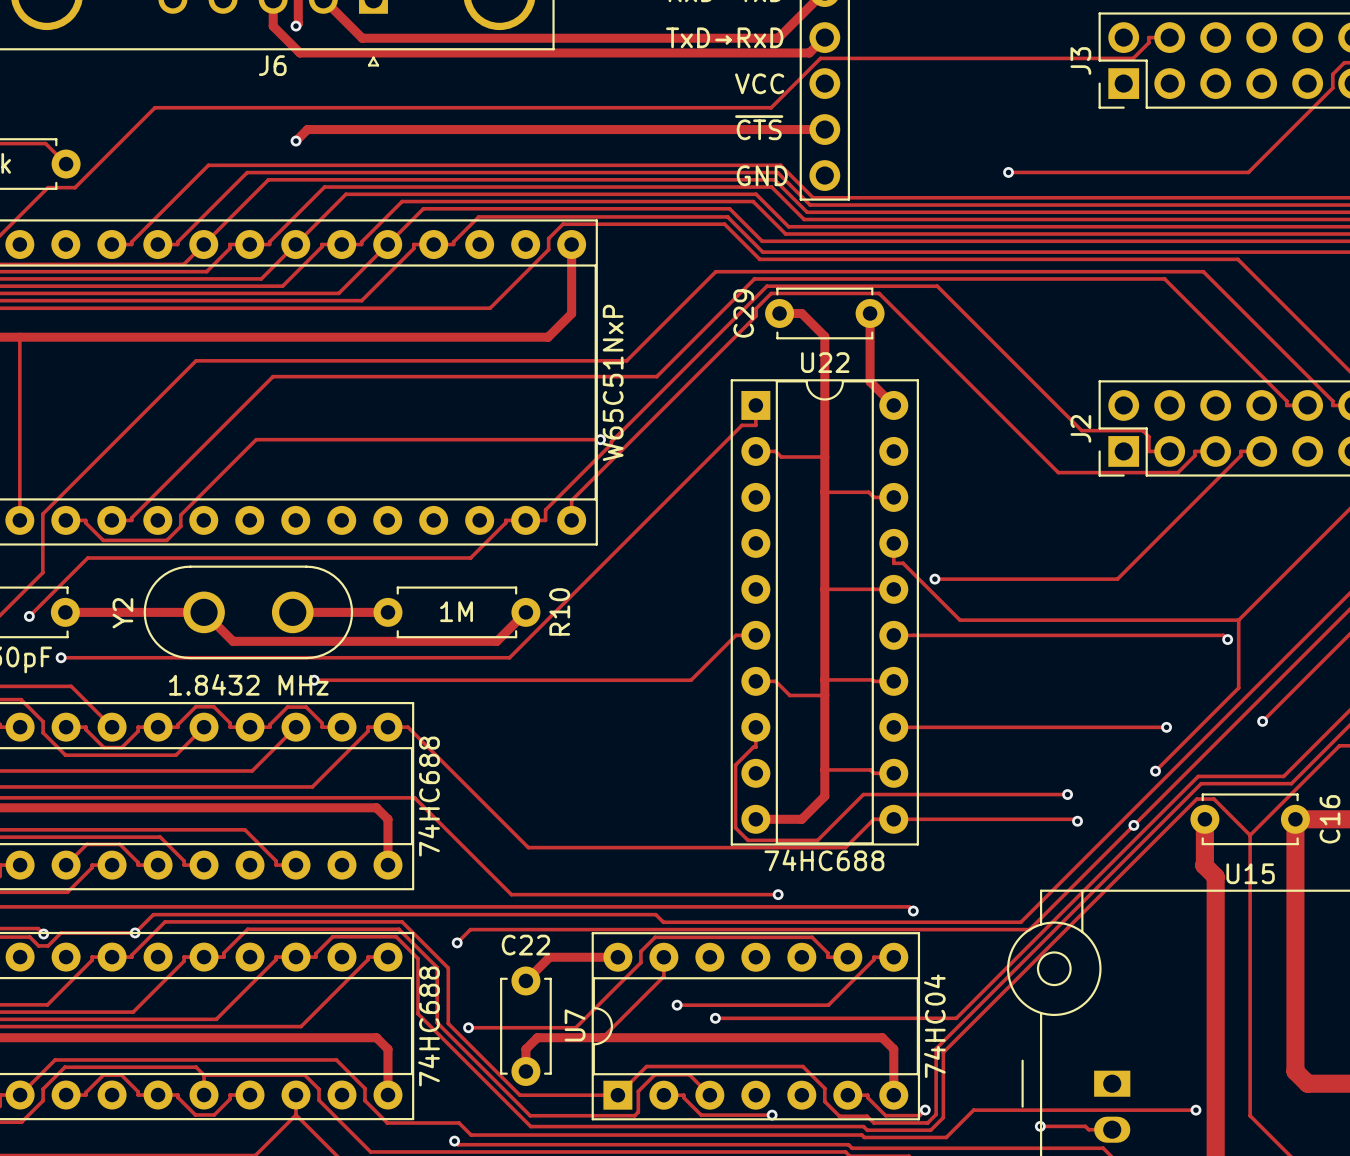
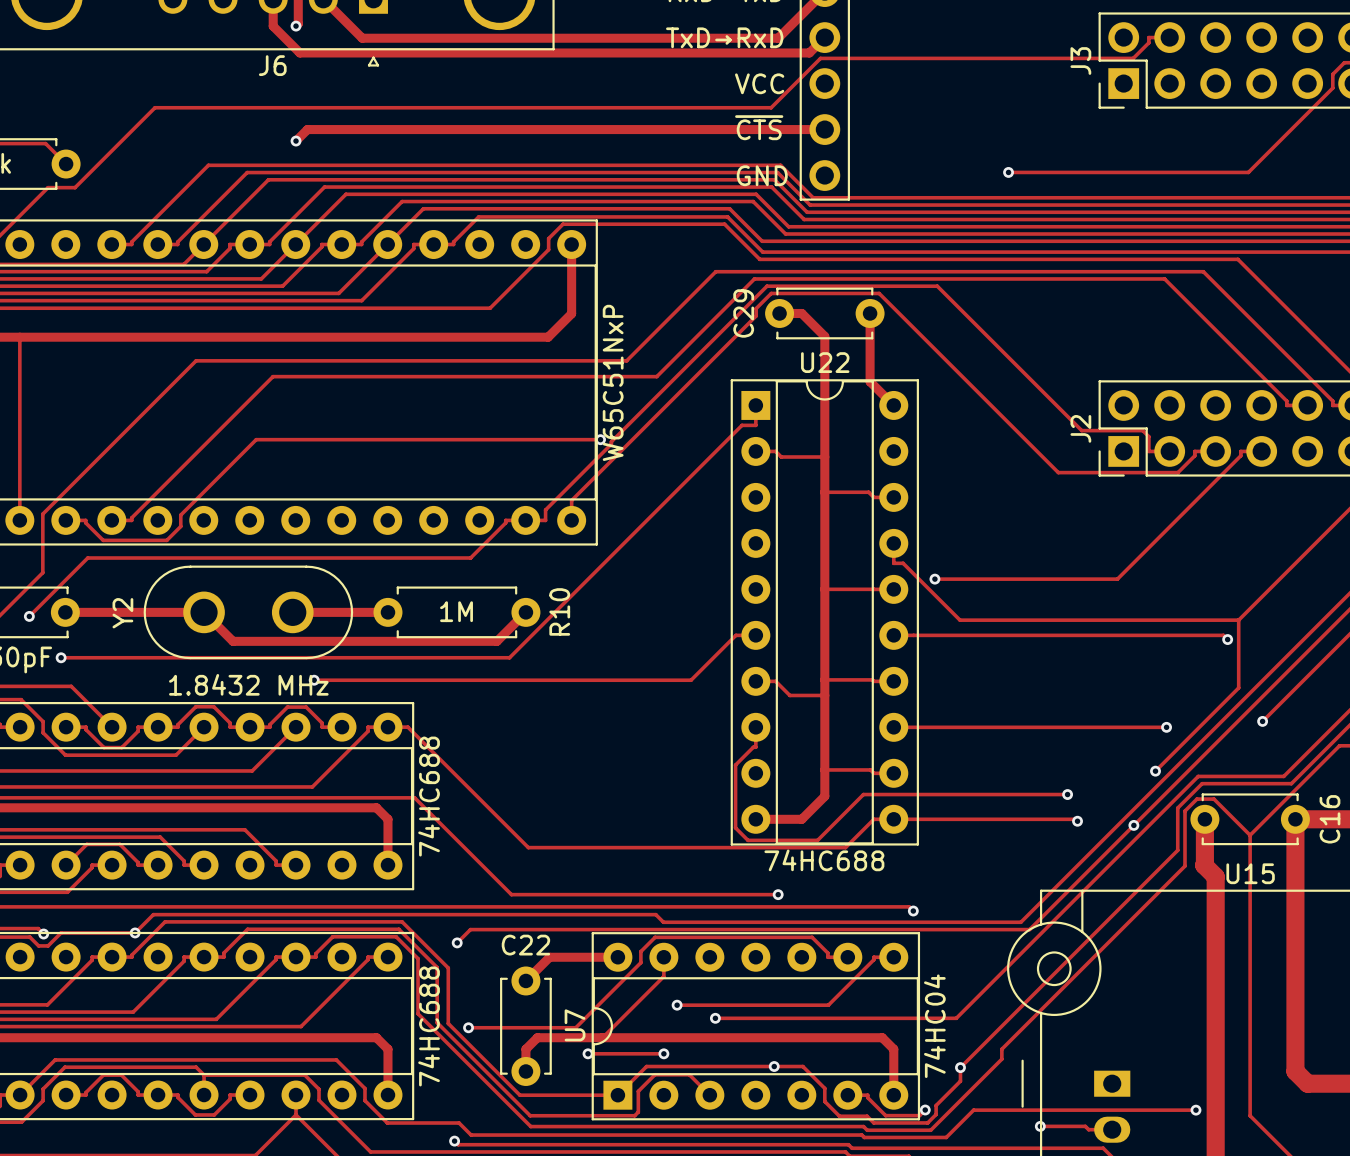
track: (1202, 783) (936, 1048) (936, 1105) -> (1202, 783) (1177, 808) (1177, 850) (960, 1067) (960, 1081) (936, 1105)
track: (1196, 799) (943, 1052) (943, 1117) -> (1196, 799) (1185, 811) (1185, 866) (1001, 1049) (1001, 1059) (943, 1117)
track: none -> (588, 1053) (663, 1053)
via: none -> (588, 1053)
via: none -> (663, 1053)
via: none -> (960, 1067)
track: (663, 1095) (683, 1095) (683, 1097) (701, 1115) (772, 1115) -> none
via position: (772, 1115) -> (774, 1066)

